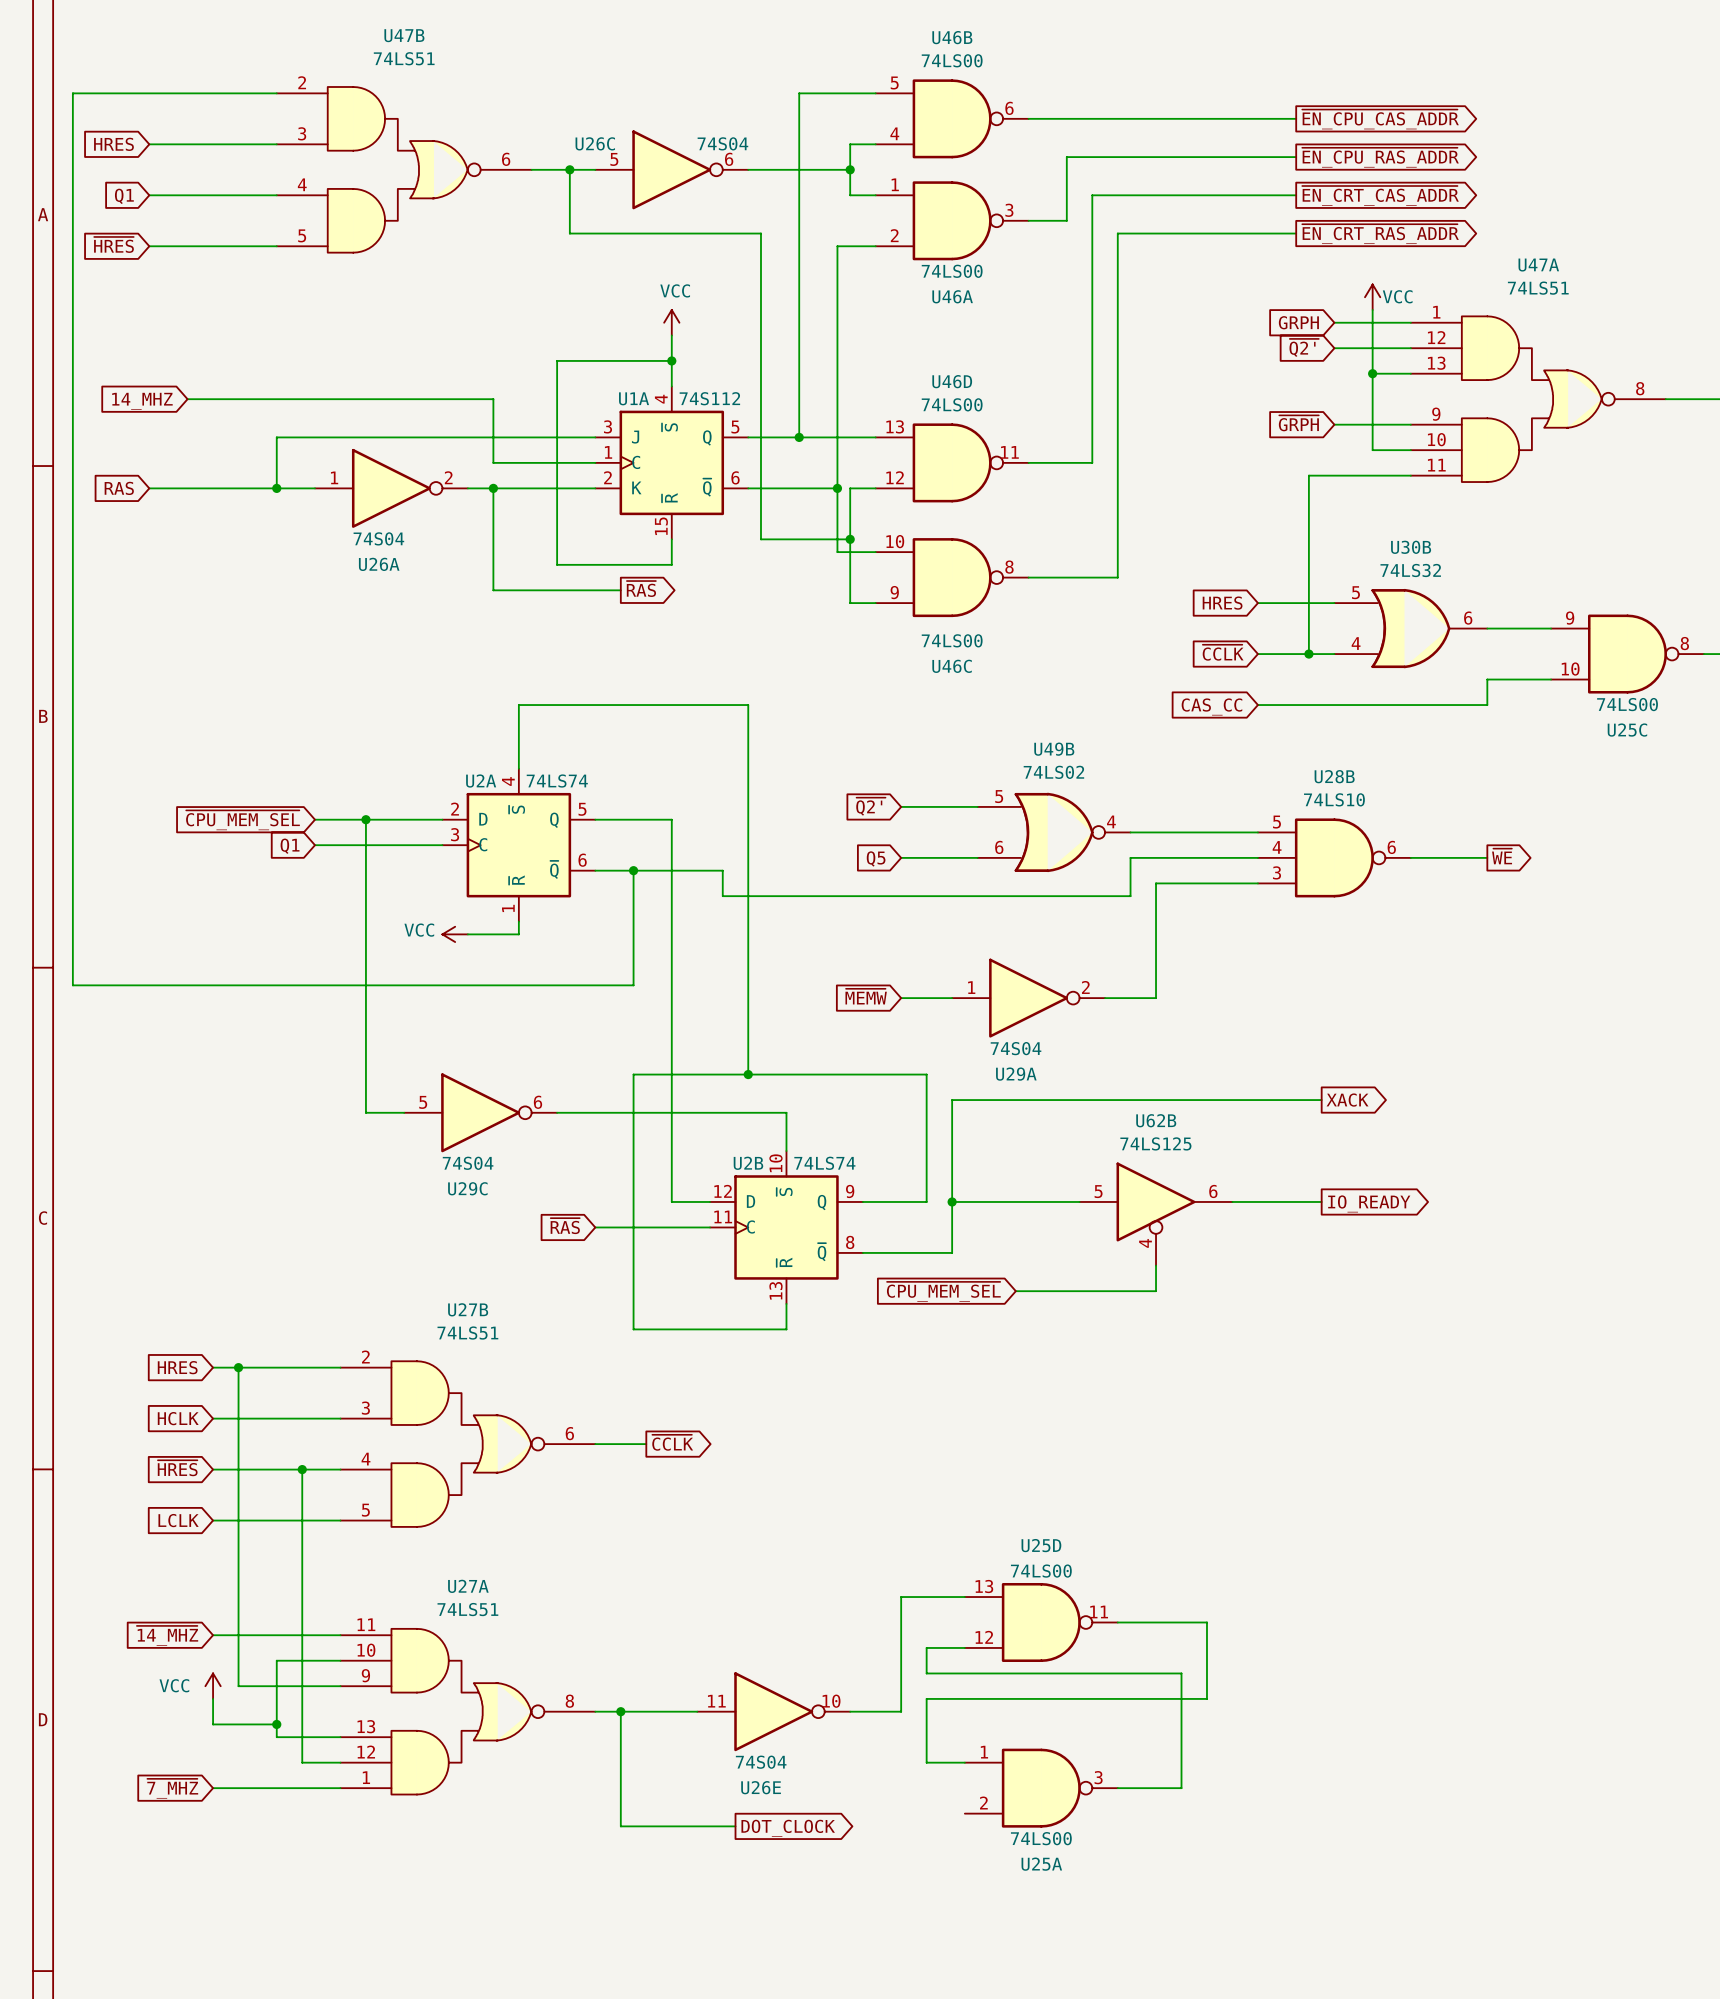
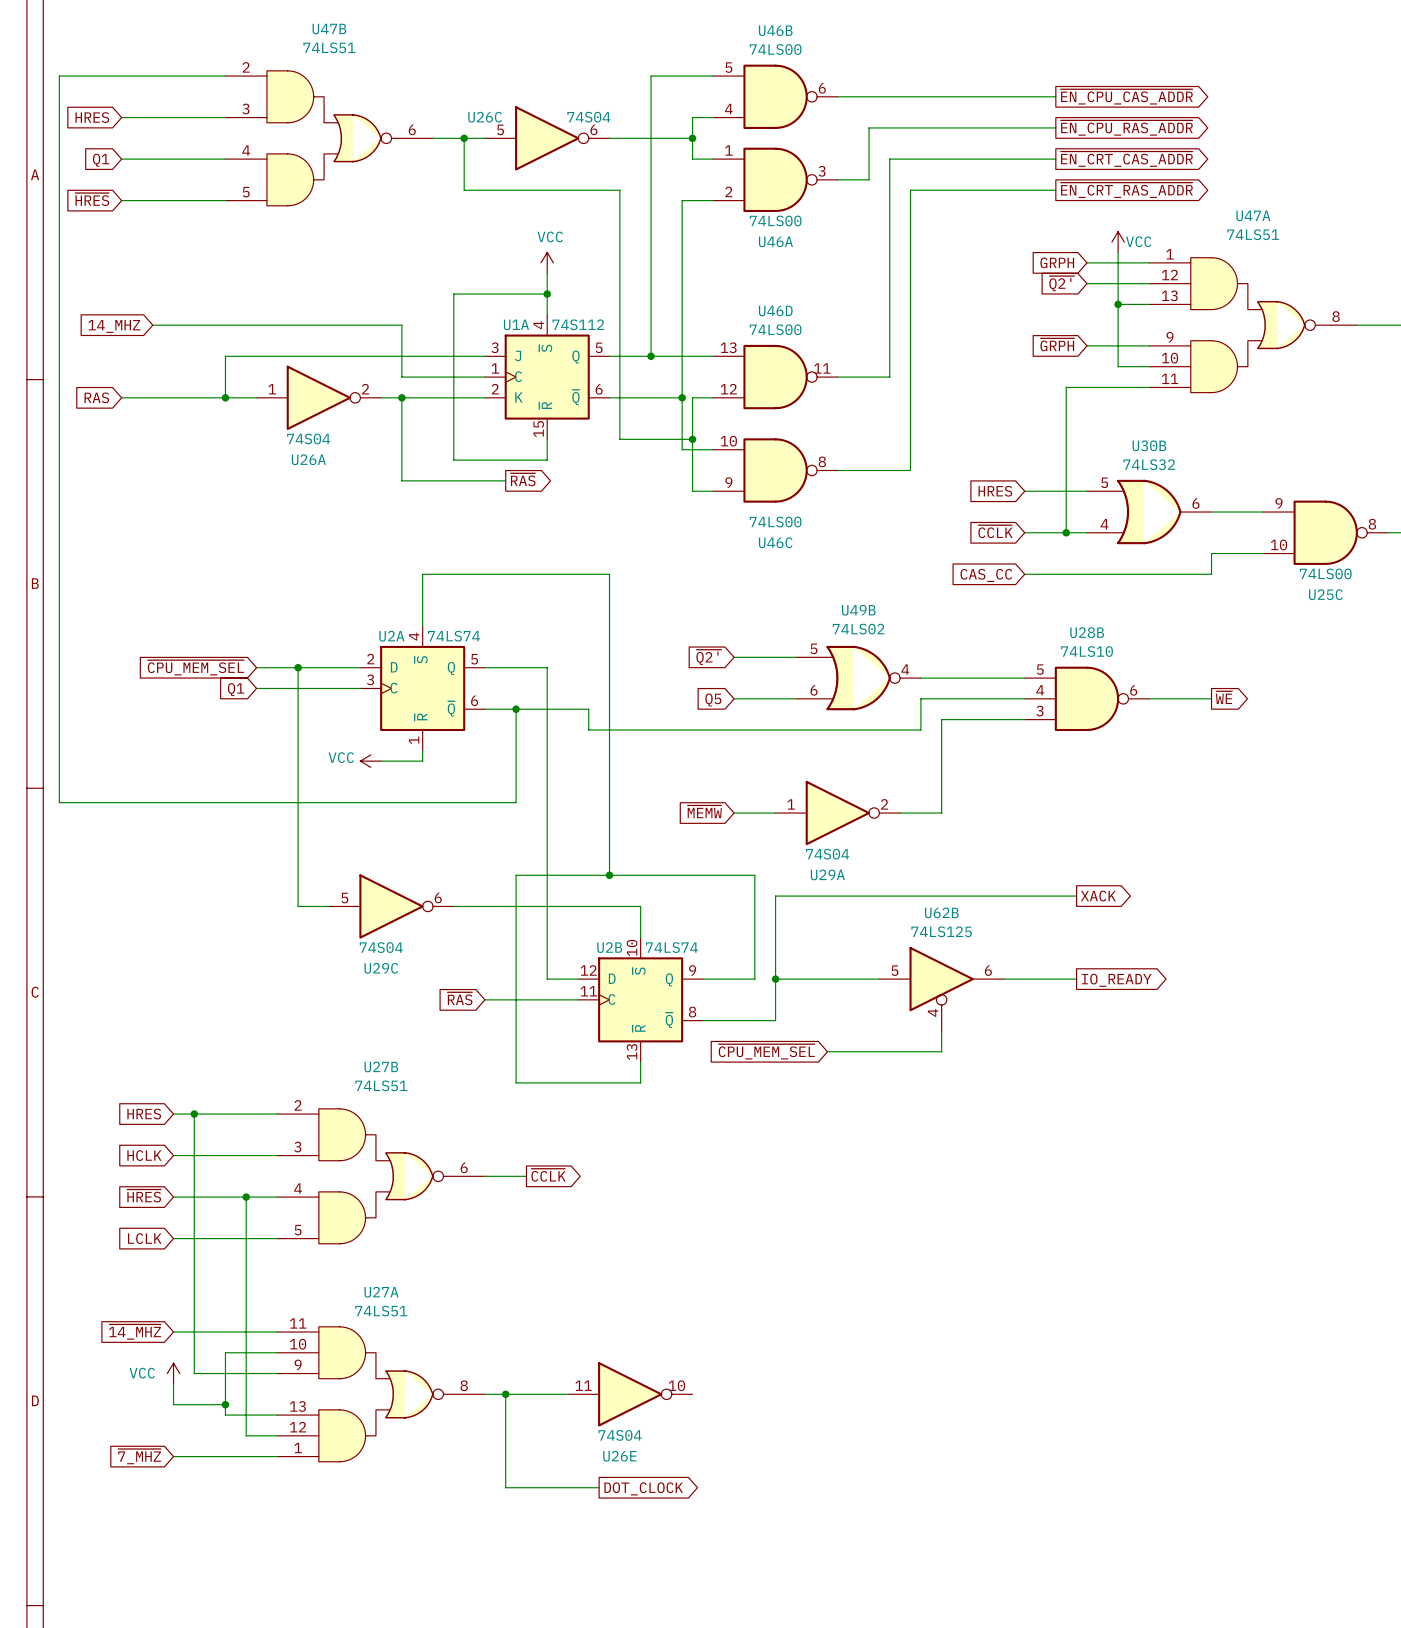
wire: (964, 1597) (901, 1597) (901, 1711) (850, 1711) -> none
U25D: 74LS00 (1041, 1622) -> none
wire: (1117, 1622) (1206, 1622) (1206, 1698) (926, 1698) (926, 1762) (964, 1762) -> none
wire: (964, 1647) (926, 1647) (926, 1673) (1181, 1673) (1181, 1788) (1117, 1788) -> none
U25A: 74LS00 (1041, 1788) -> none

